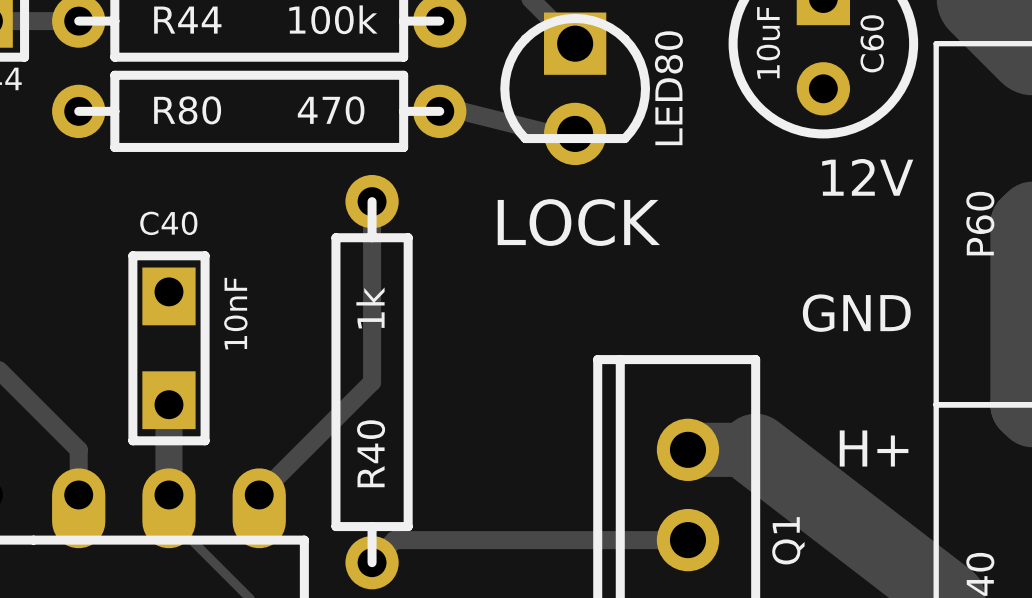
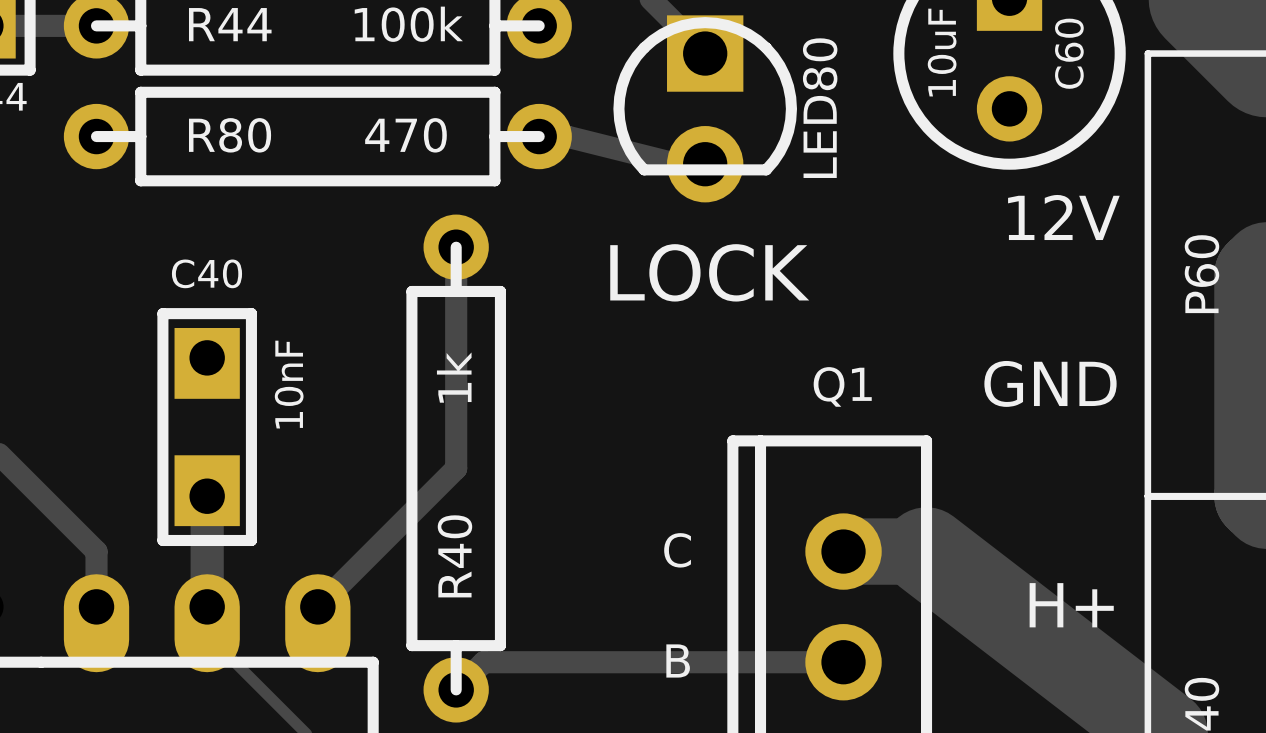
text: none -> C (677, 550)
text position: H+ (874, 448) -> H+ (1071, 605)
text: none -> B (678, 660)
Q1 name rotation: 0° (788, 540) -> 90° clockwise (842, 386)
Q1 name position: Q1 (788, 540) -> Q1 (842, 386)

